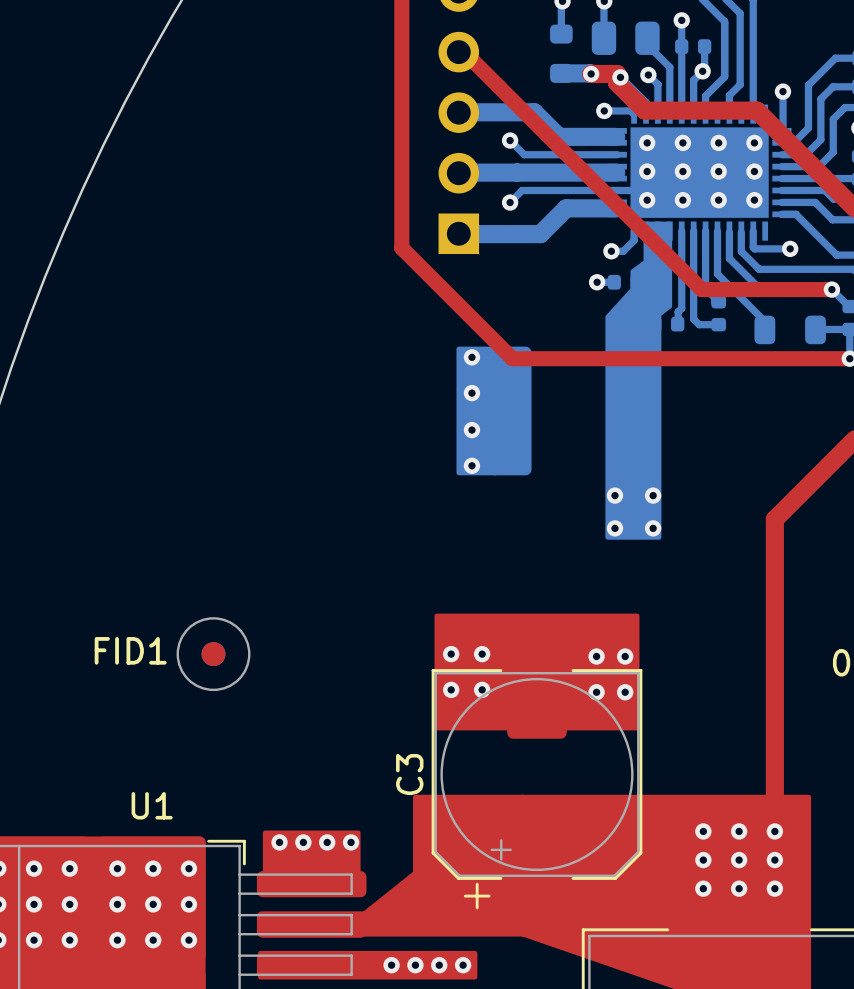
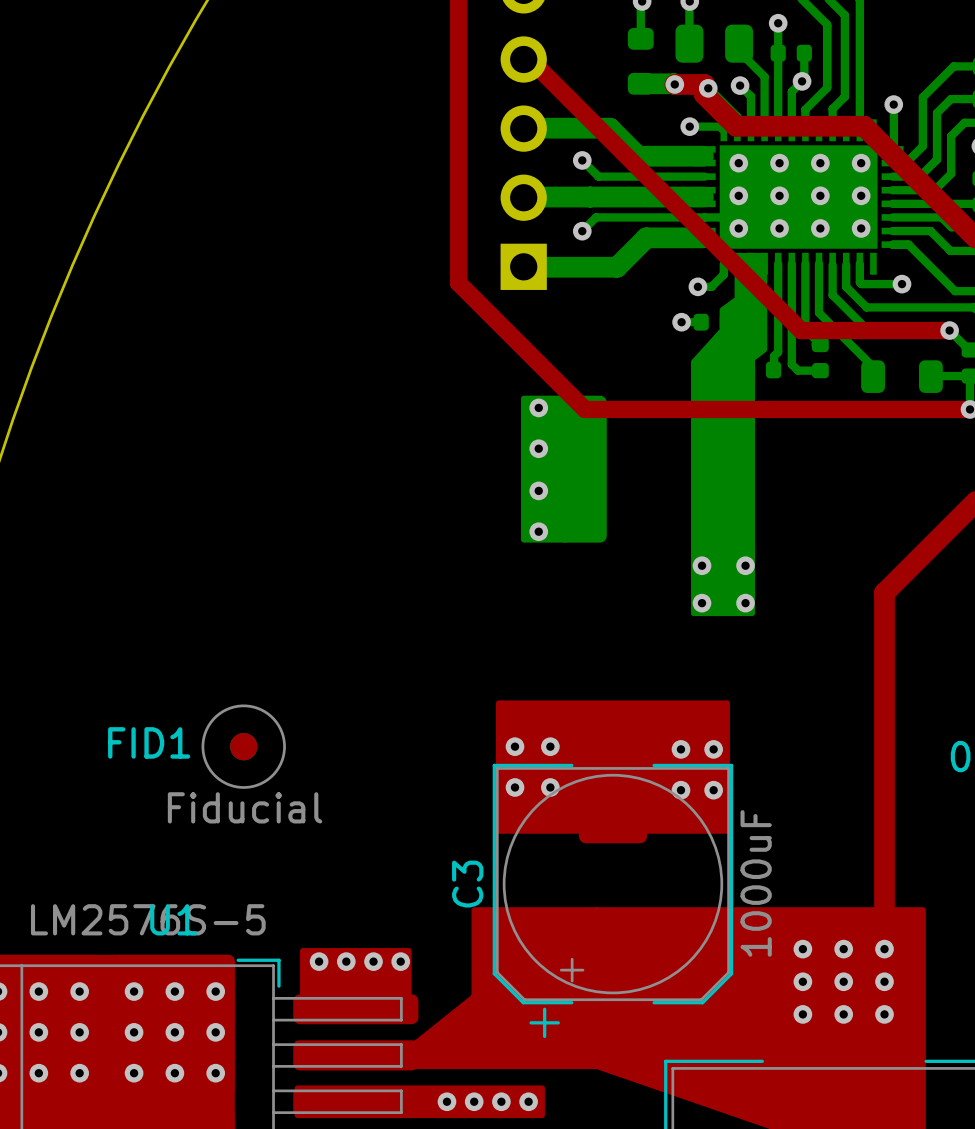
FID1 value: none -> Fiducial (245, 807)
C3 value: none -> 1000uF (756, 883)
U1 value: none -> LM2576S-5 (148, 919)

